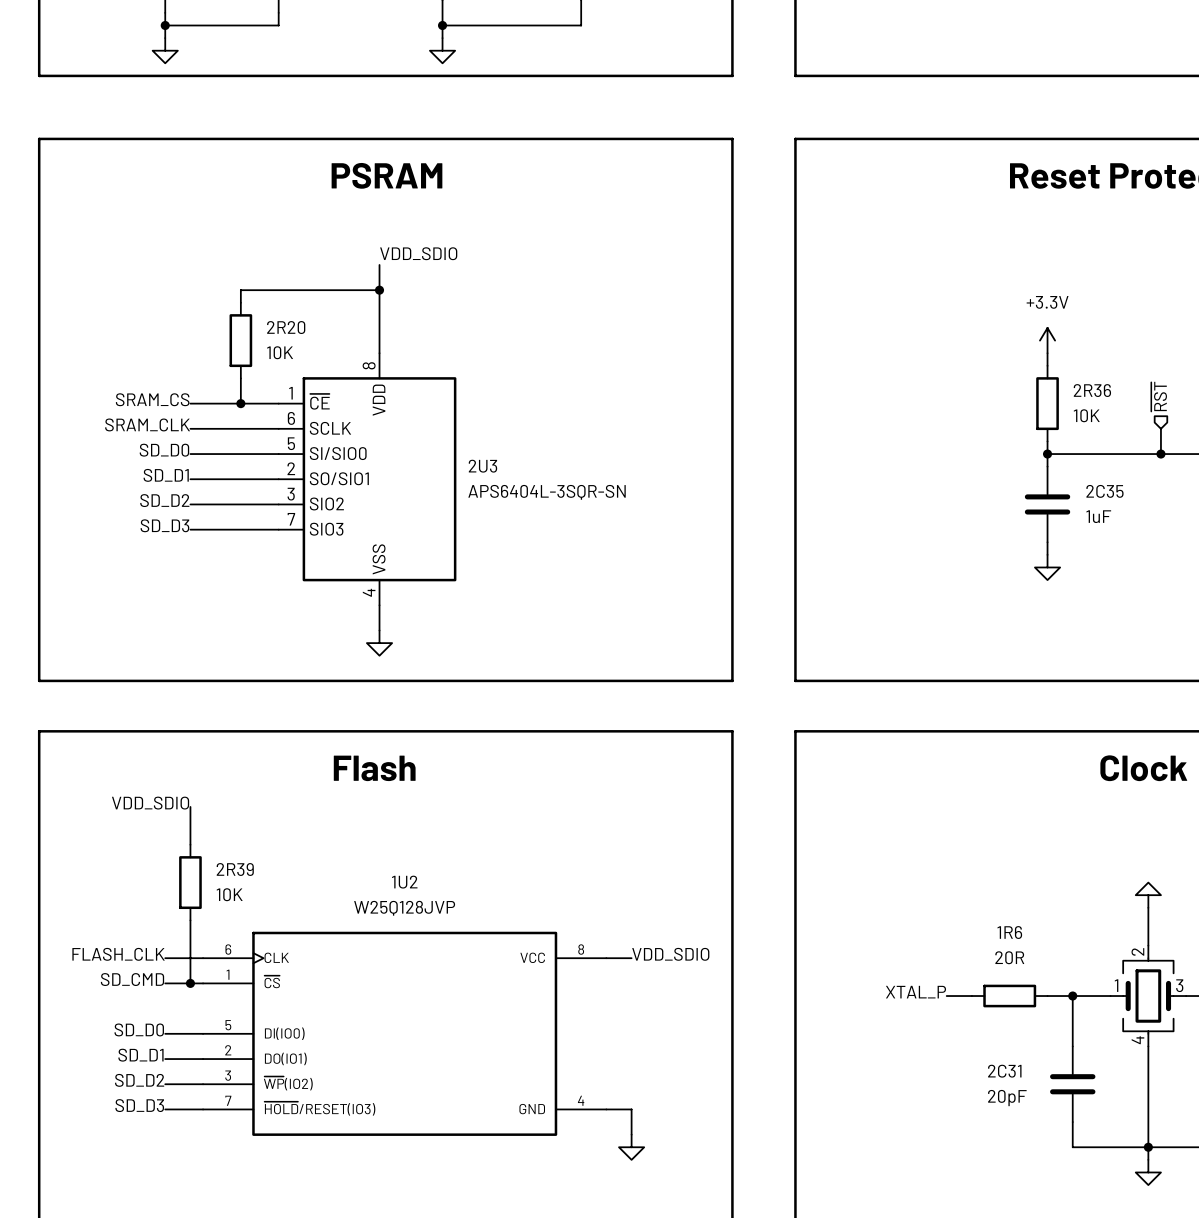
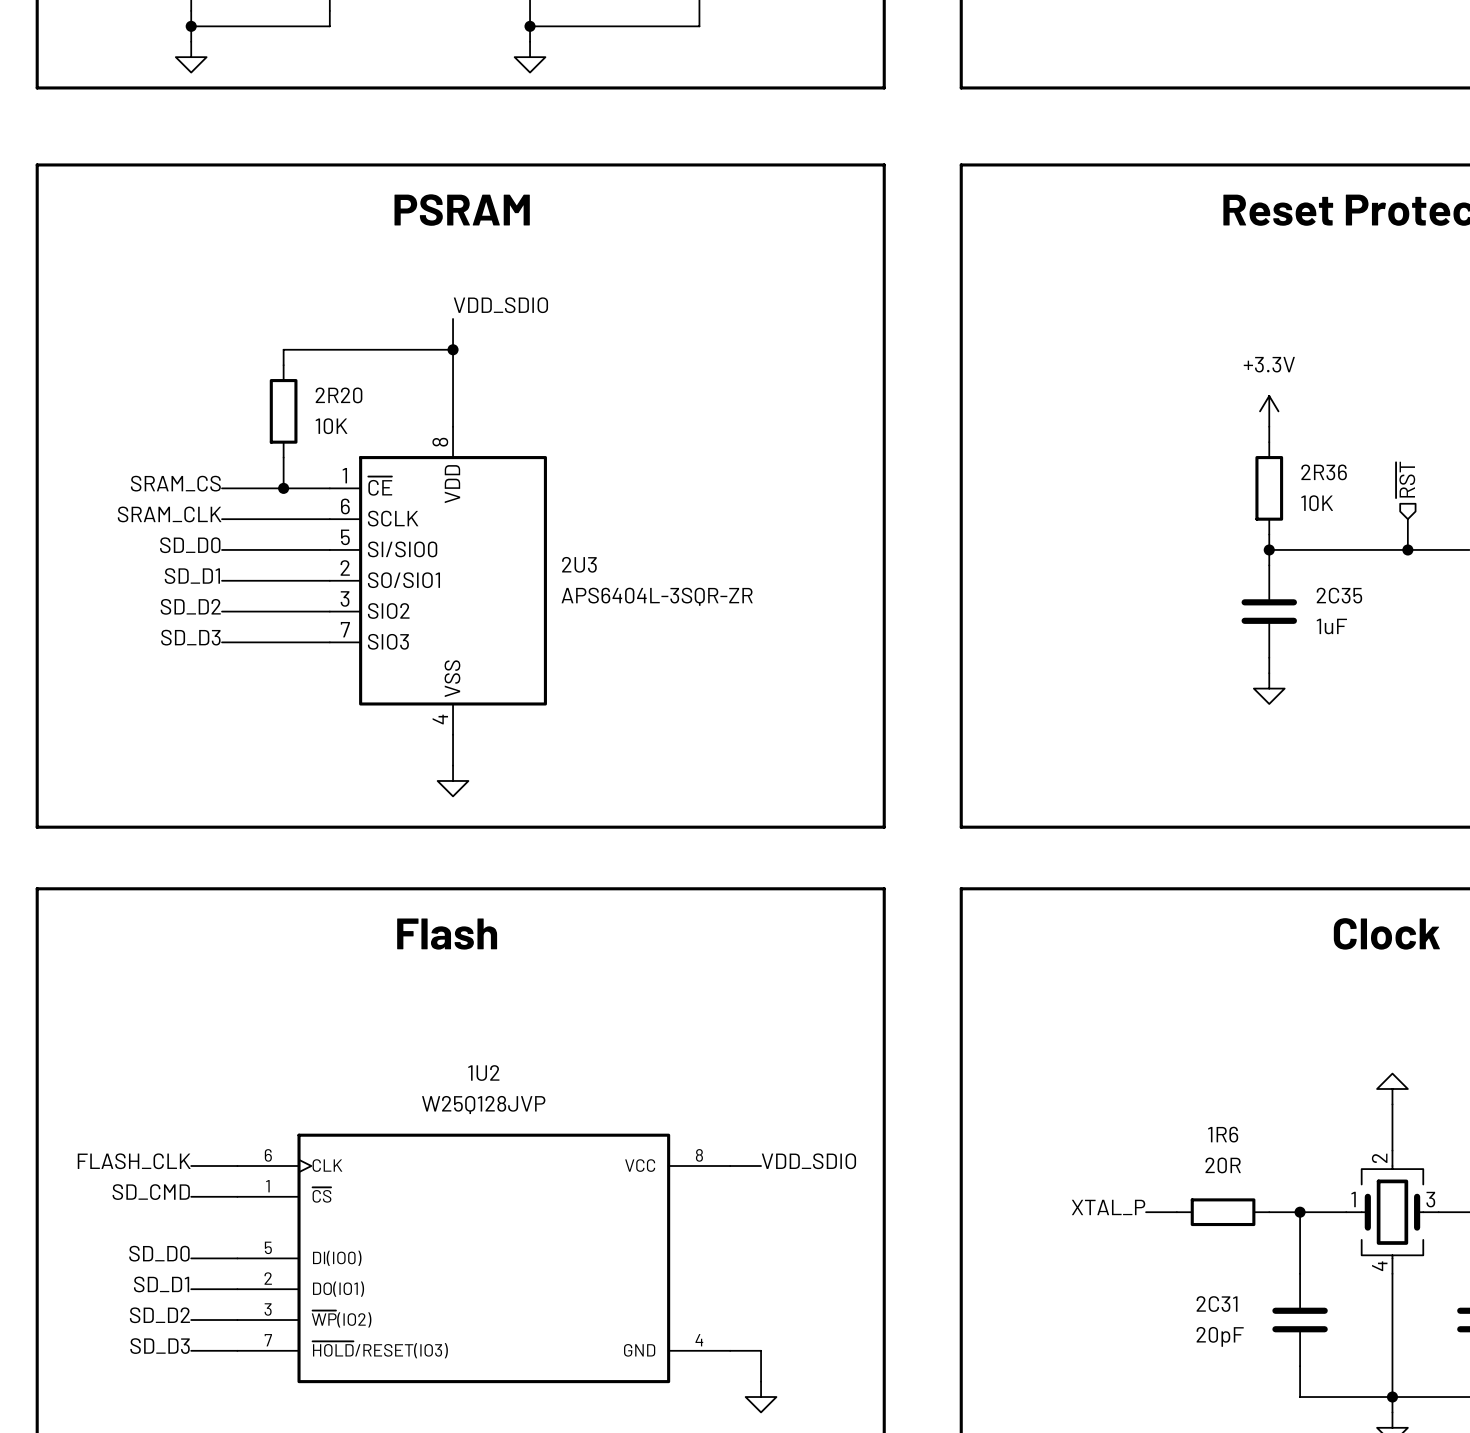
2U3 value: APS6404L-3SQR-SN (547, 492) -> APS6404L-3SQR-ZR (657, 596)
label: VDD_SDIO (150, 803) -> none
wire: (190, 806) (190, 844) -> none
2R39: 10K (190, 882) -> none
wire: (190, 920) (190, 983) -> none
junction: (190, 983) -> none

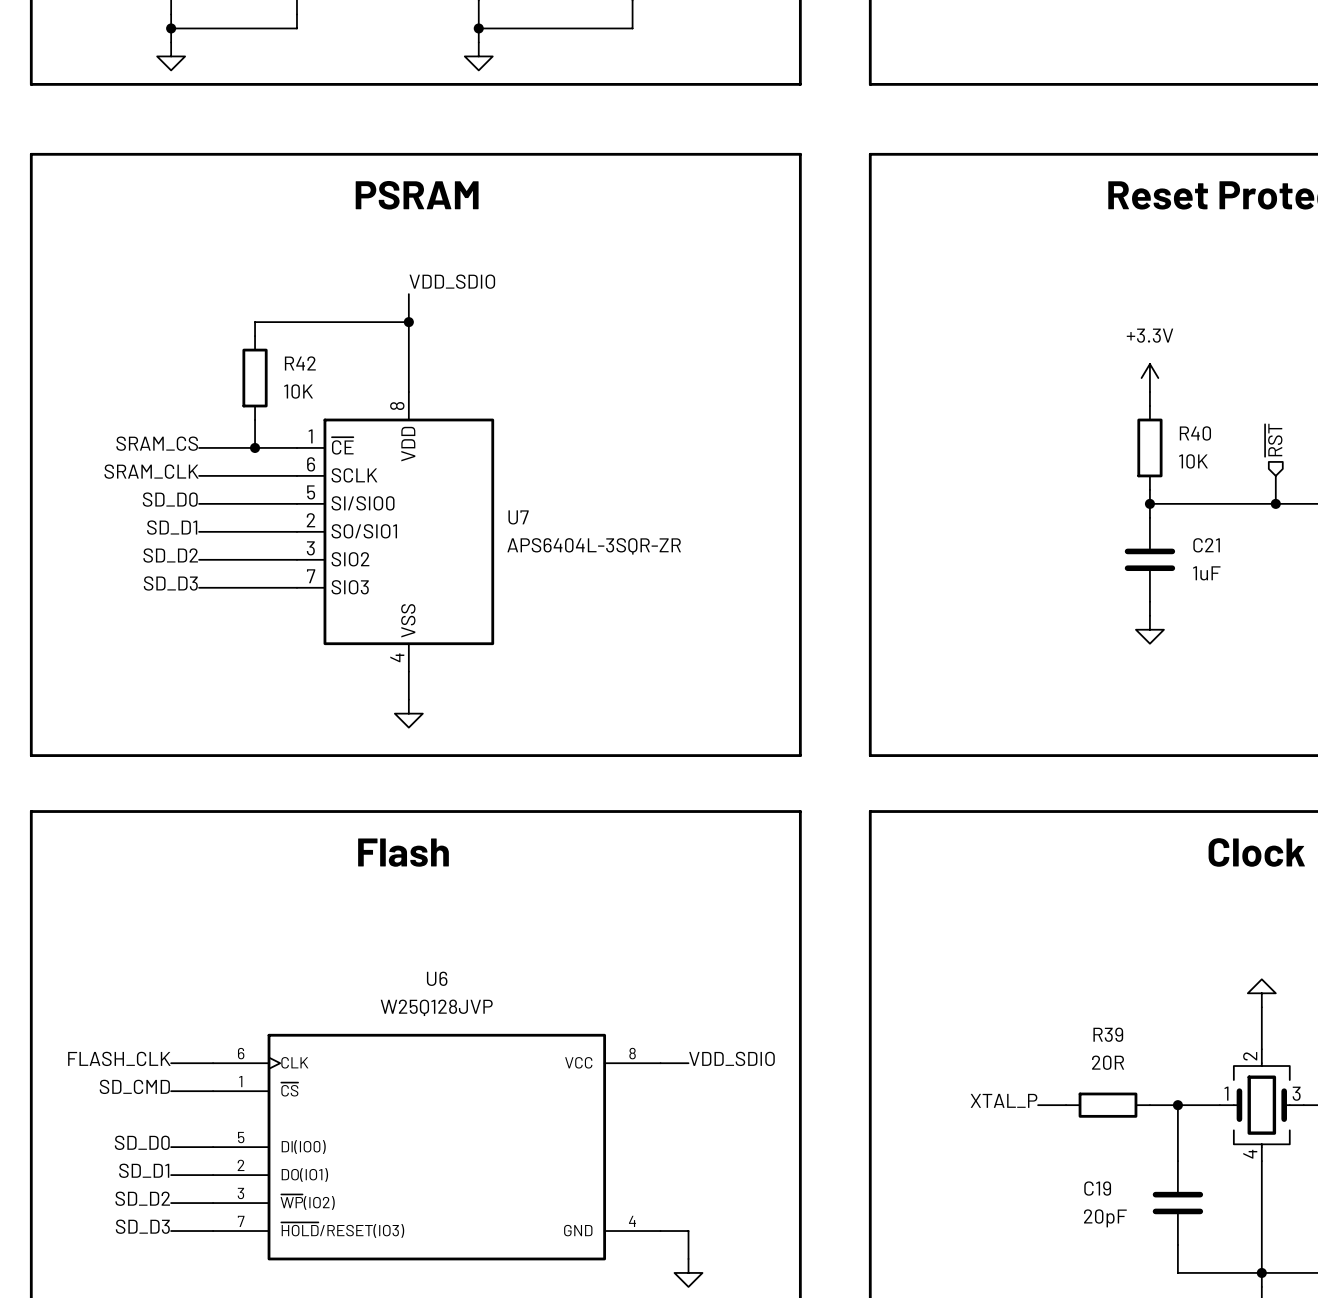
2R20 name: 2R20 (339, 395) -> R42 (300, 363)
2R36 name: 2R36 (1324, 472) -> R40 (1195, 433)
2U3 name: 2U3 (579, 564) -> U7 (518, 517)
2C35 name: 2C35 (1339, 595) -> C21 (1206, 545)
1U2 name: 1U2 (483, 1073) -> U6 (437, 978)
1R6 name: 1R6 (1223, 1134) -> R39 (1108, 1034)
2C31 name: 2C31 (1217, 1304) -> C19 (1097, 1188)

